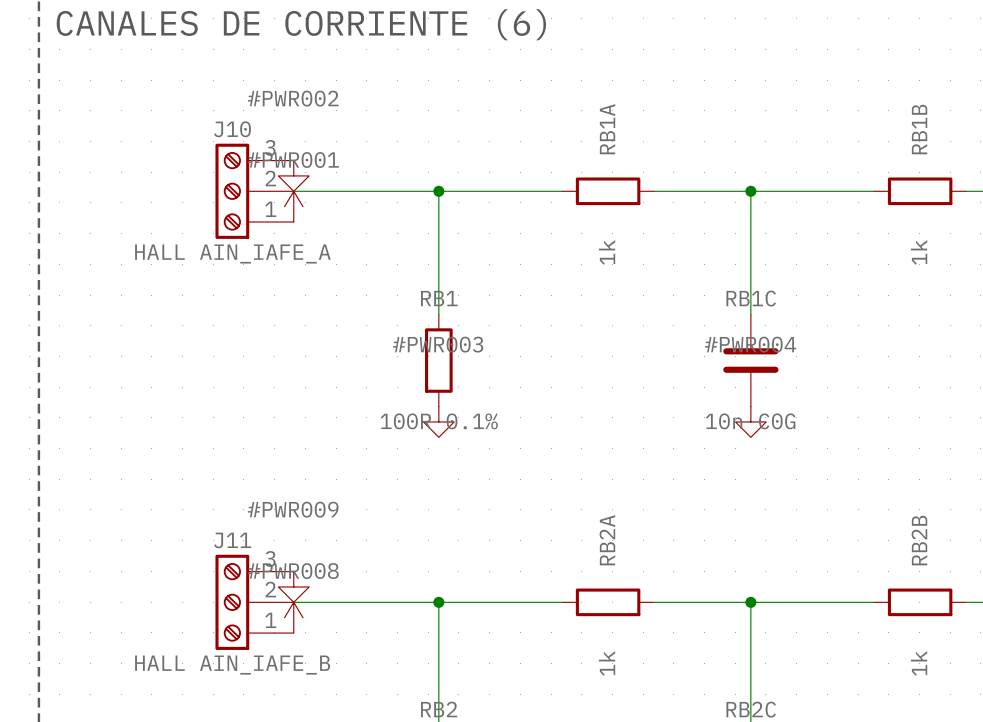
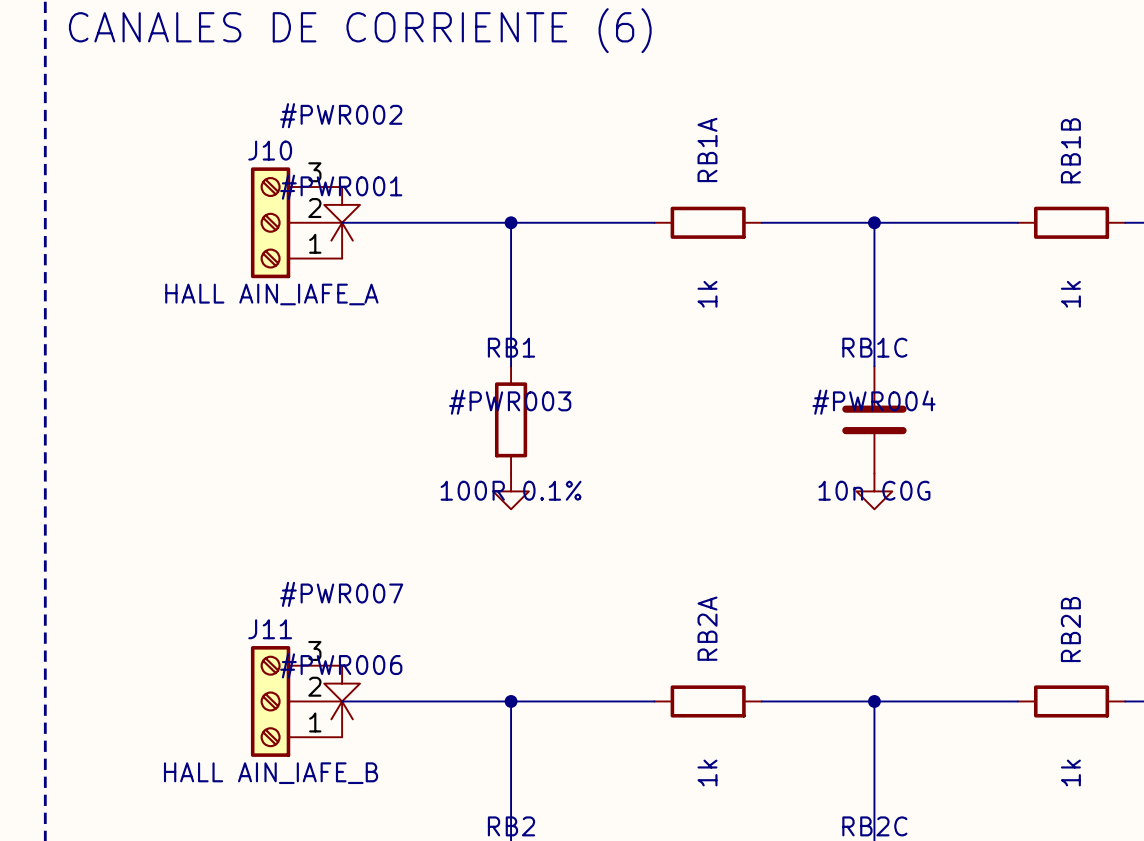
#PWR009 name: #PWR009 (293, 509) -> #PWR007 (341, 594)
#PWR008 name: #PWR008 (293, 571) -> #PWR006 (341, 665)

